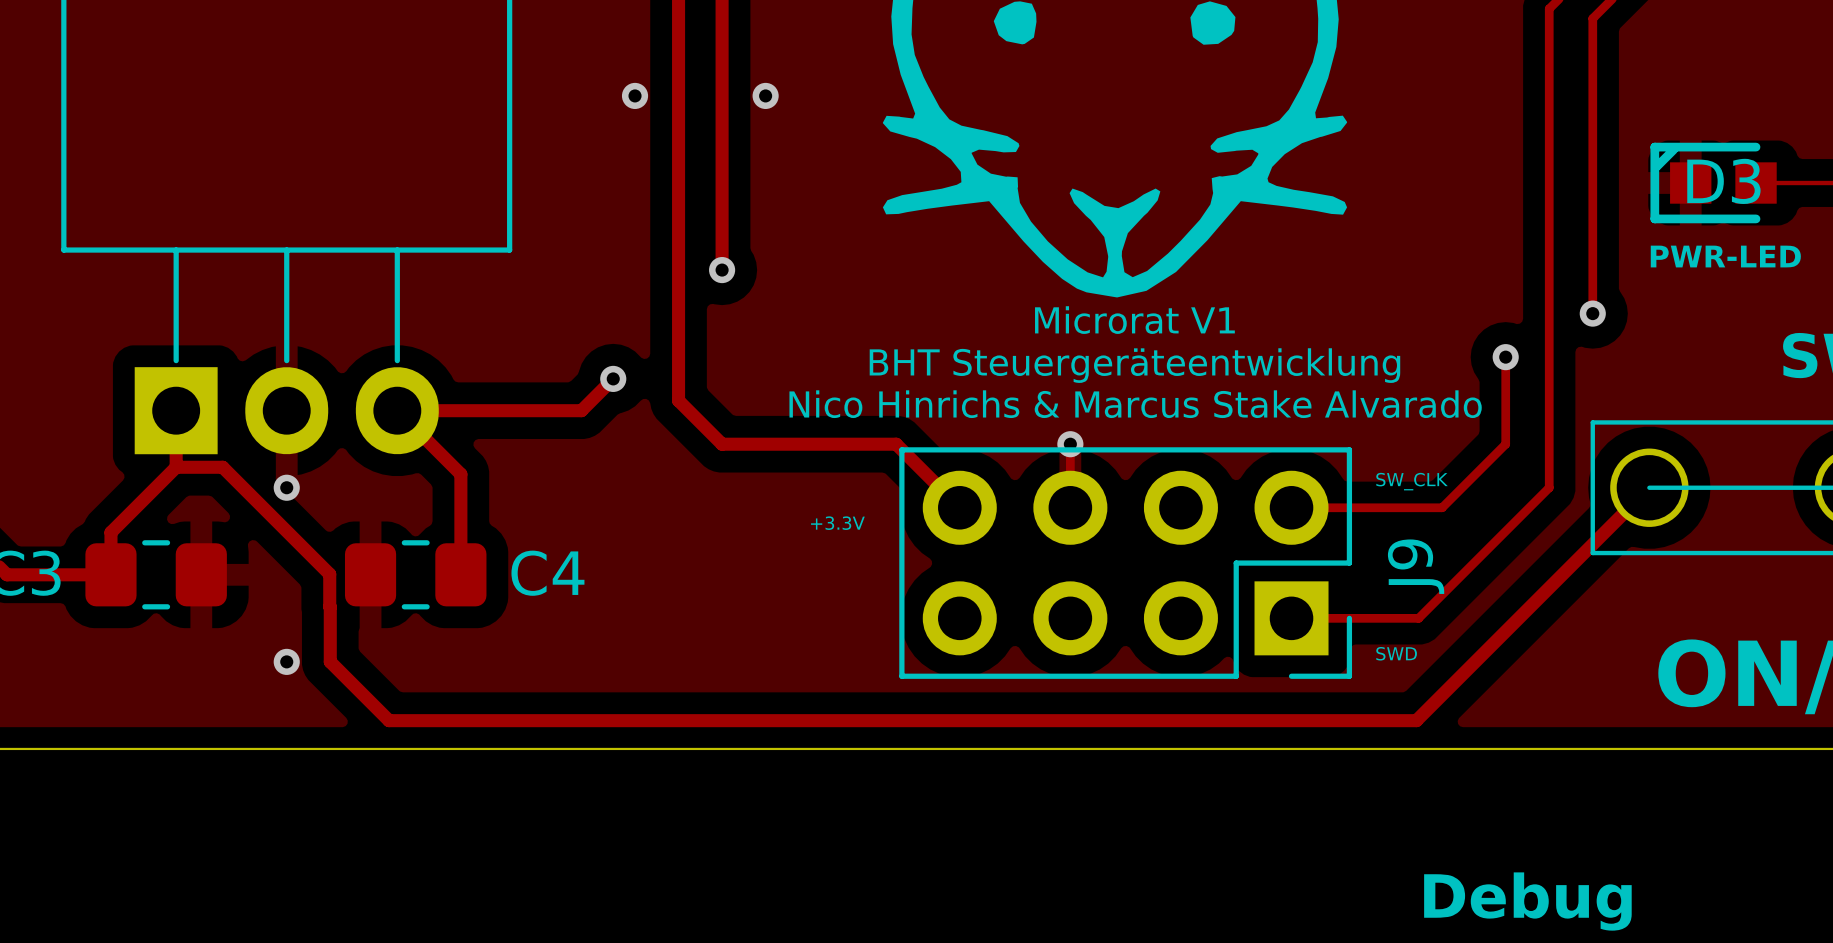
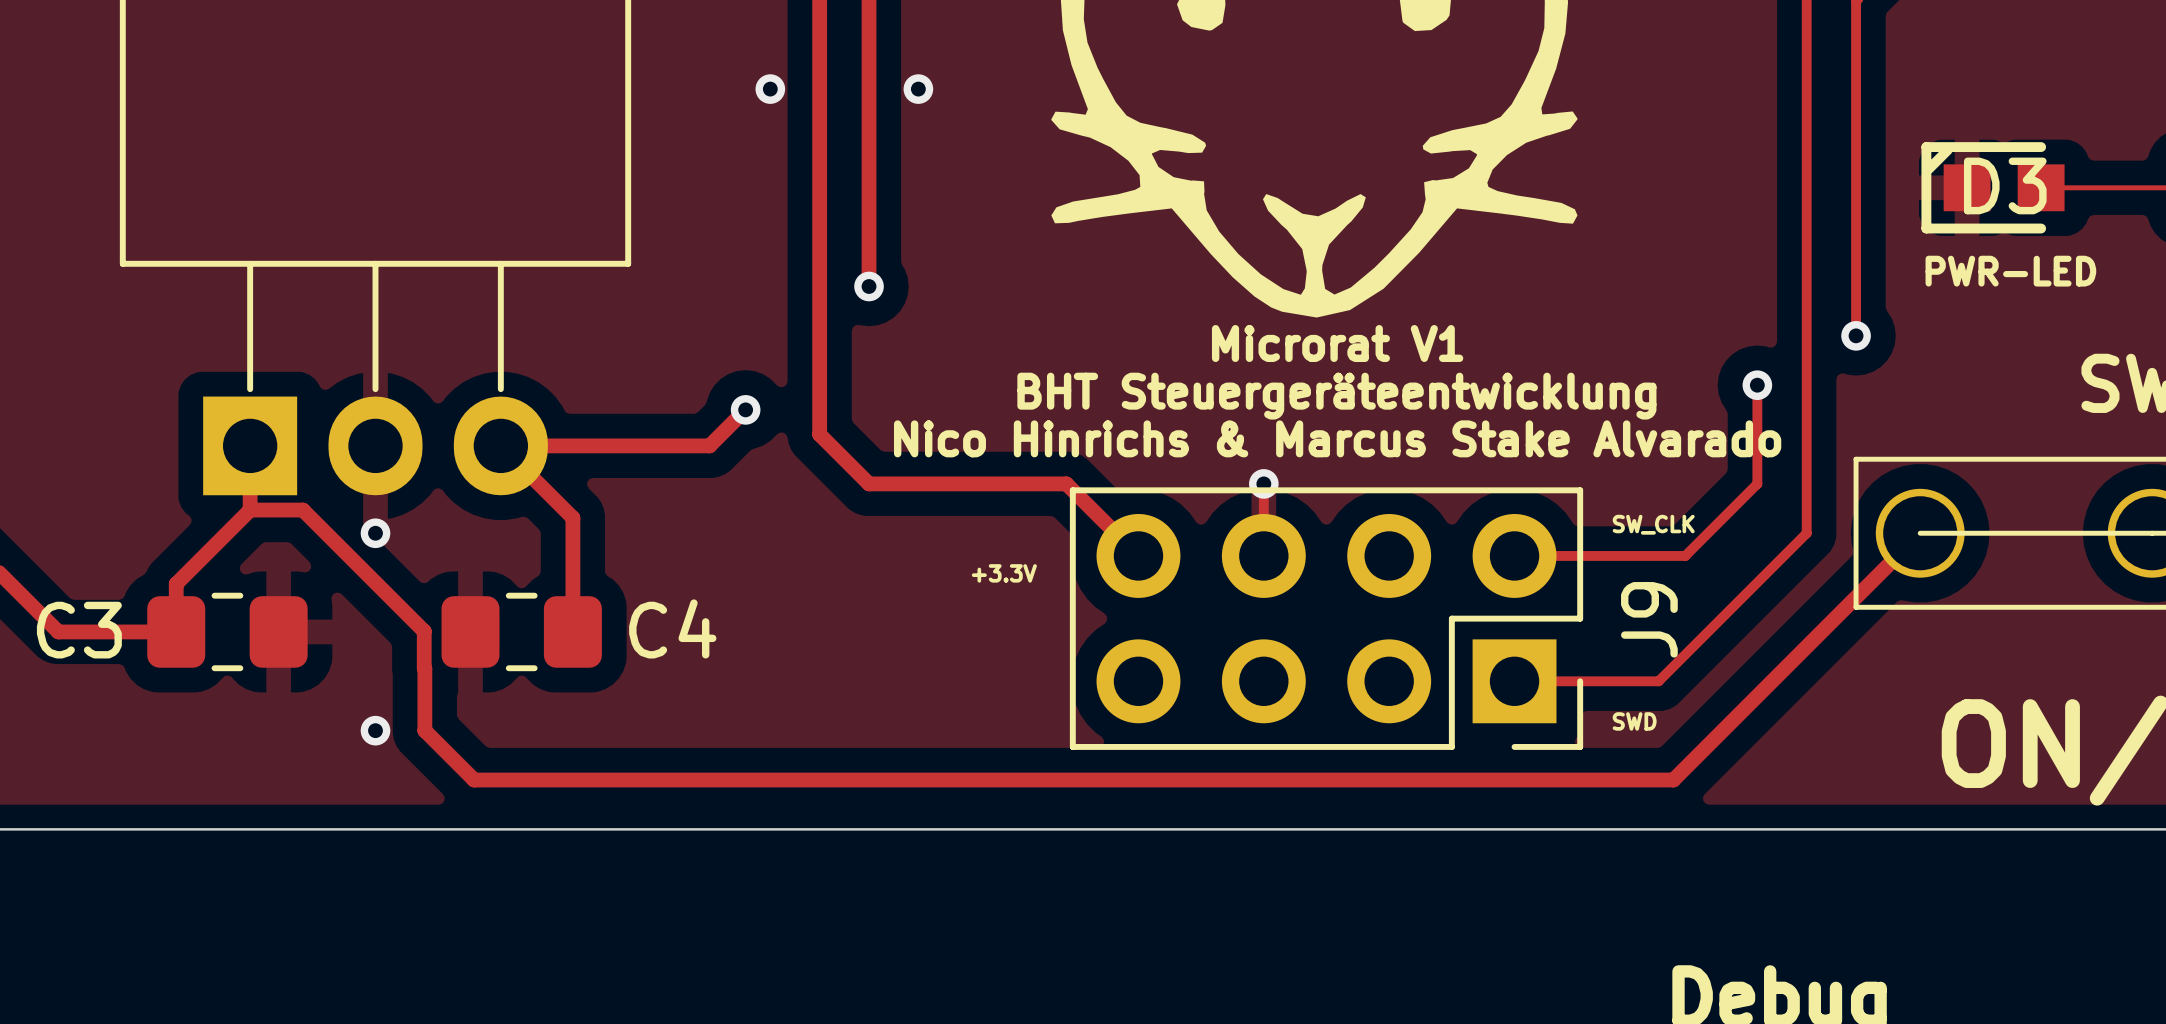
track: (373, 705) (389, 720) (1416, 720) (1431, 705) -> (474, 780) (1673, 780)

